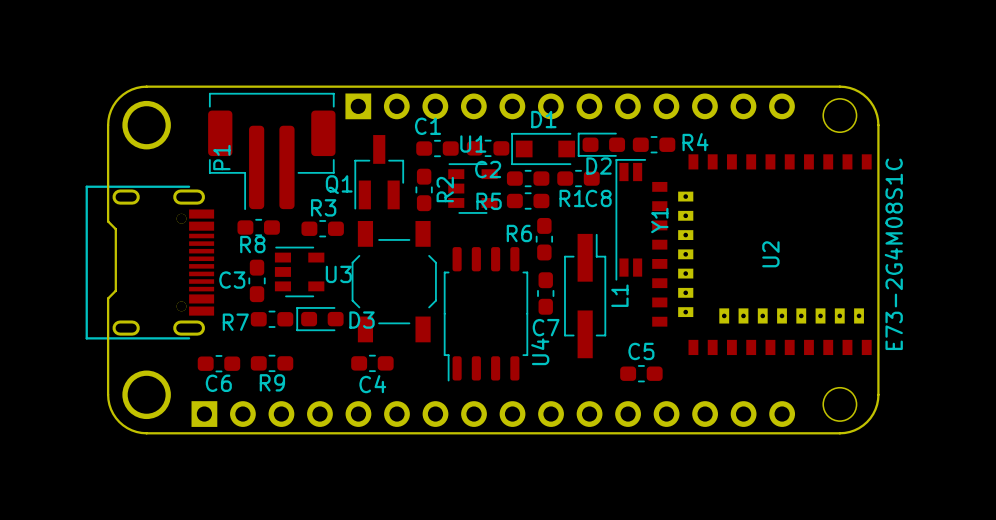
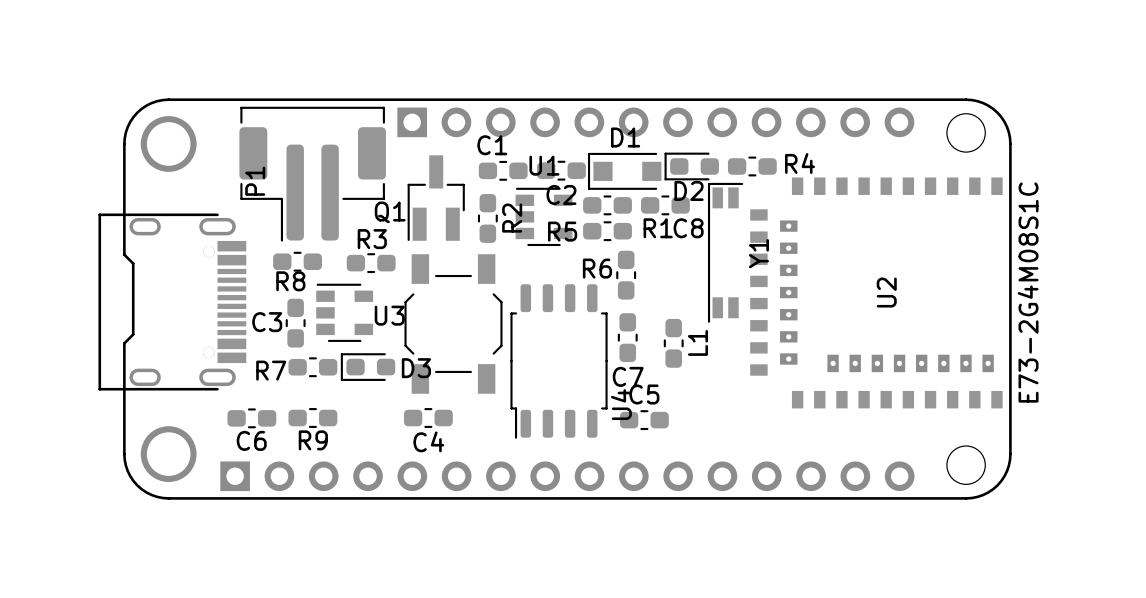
L1 footprint: [564, 233, 607, 359] -> [663, 318, 684, 368]
C5 position: (641, 373) -> (644, 420)

